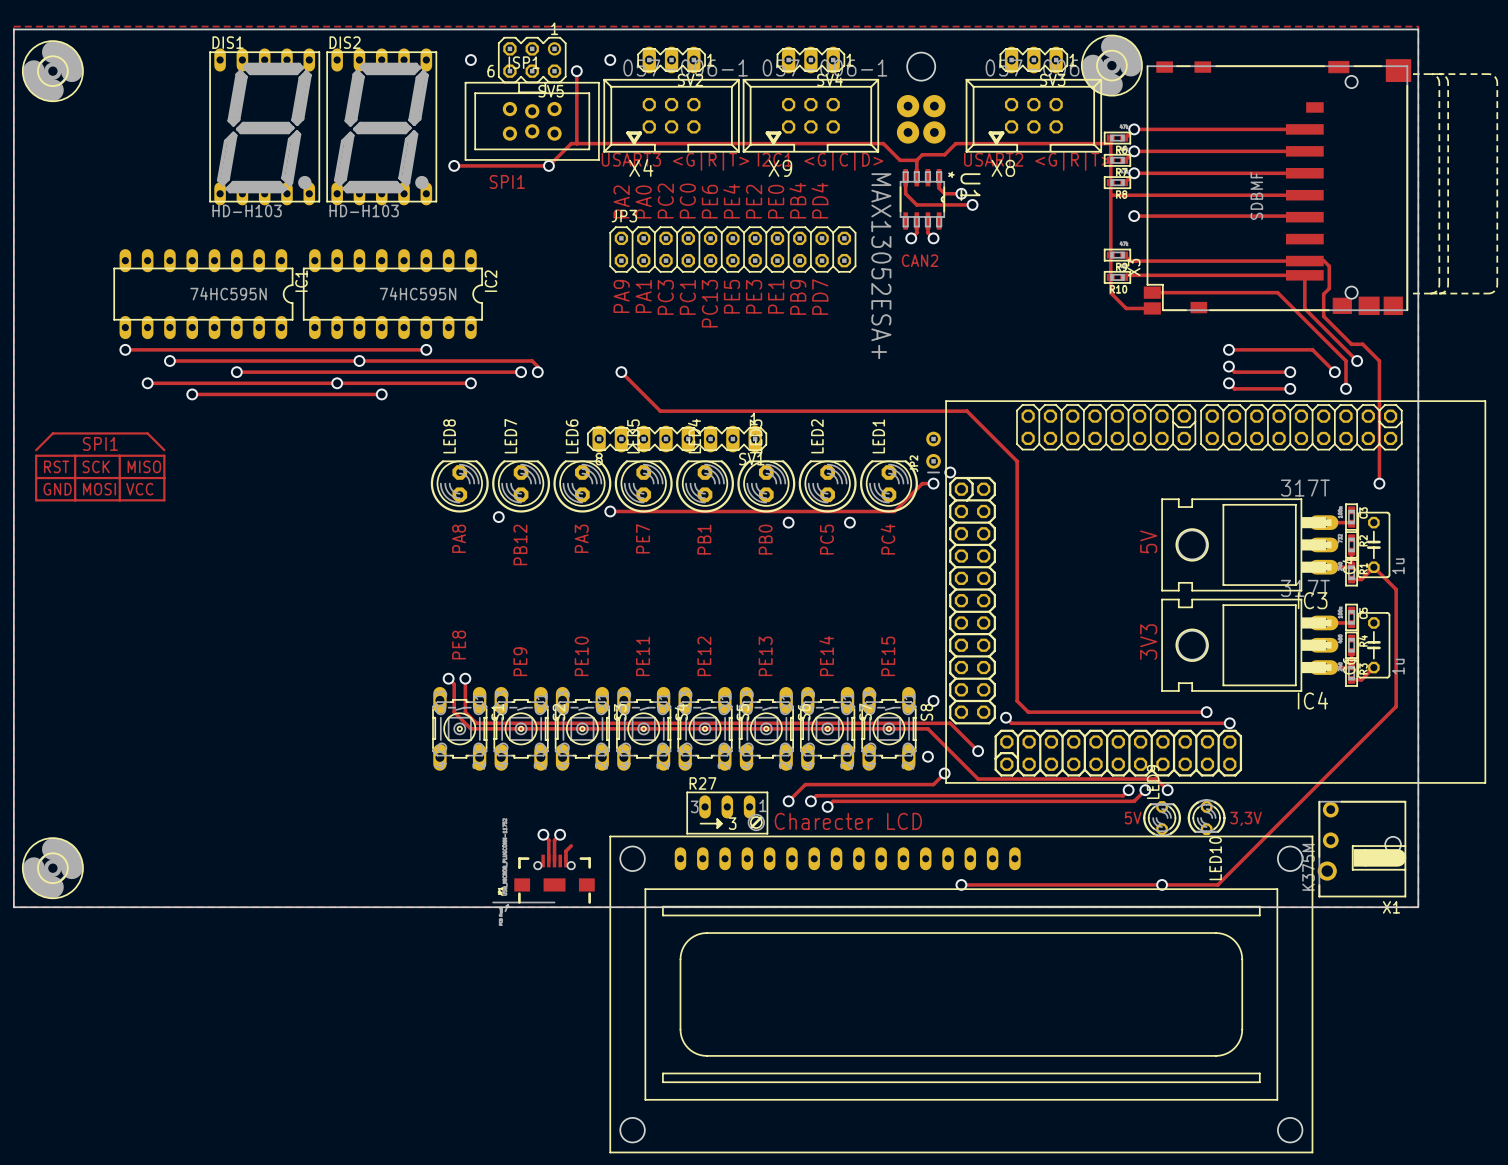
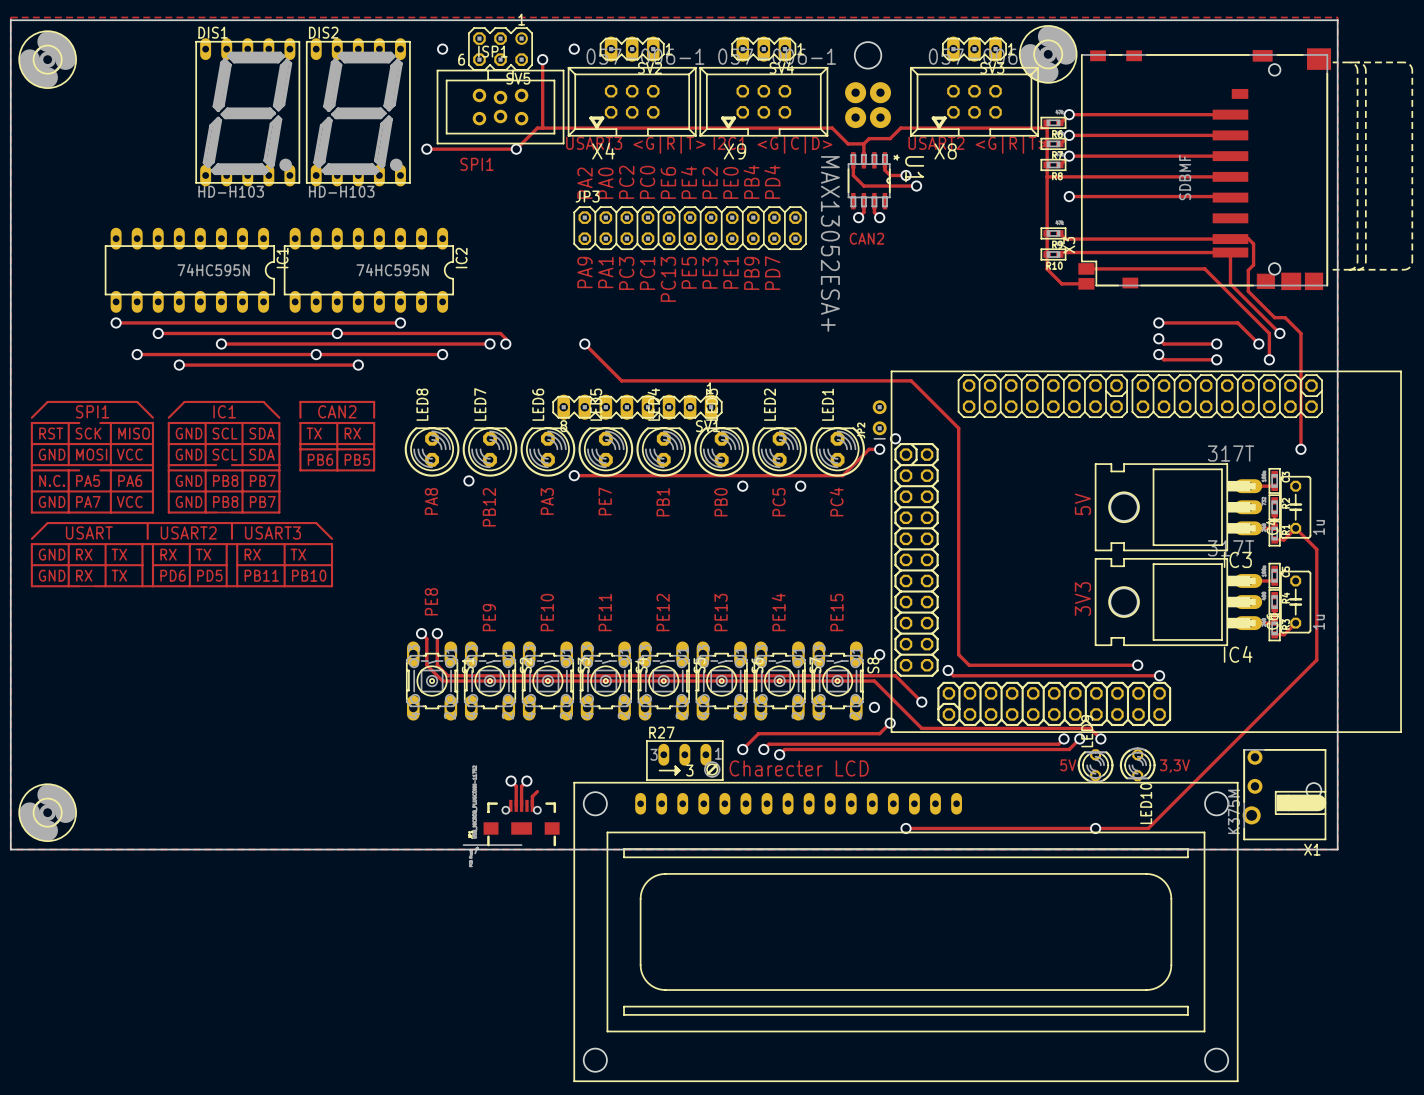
text: none -> IC1 (224, 411)
text: none -> CAN2 (337, 411)
track: none -> (168, 417) (184, 401) (263, 401) (279, 417)
track: none -> (300, 417) (300, 401) (374, 401) (374, 417)
track: (86, 455) (108, 455) -> none
track: none -> (168, 423) (279, 423) (279, 512) (168, 512) (168, 423)
track: none -> (205, 423) (205, 465)
track: none -> (242, 423) (242, 465)
track: none -> (300, 423) (374, 423) (374, 470) (300, 470) (300, 423)
track: none -> (337, 423) (337, 470)
text: none -> GND (189, 433)
text: none -> SCL (225, 433)
text: none -> SDA (262, 433)
text: none -> TX (314, 433)
text: none -> RX (352, 433)
track: none -> (168, 444) (279, 444)
track: none -> (300, 444) (374, 444)
track: none -> (300, 449) (374, 449)
text: none -> GND (189, 454)
text: none -> SCL (225, 454)
text: none -> SDA (262, 454)
text: none -> PB6 (320, 459)
text: none -> PB5 (357, 459)
track: none -> (31, 465) (31, 512) (152, 512) (152, 465)
track: none -> (168, 465) (216, 465)
track: none -> (231, 465) (279, 465)
track: none -> (31, 470) (79, 470)
track: none -> (68, 470) (68, 512)
track: none -> (100, 470) (152, 470)
track: none -> (110, 470) (110, 512)
track: none -> (168, 470) (279, 470)
track: none -> (205, 470) (205, 512)
track: none -> (242, 470) (242, 512)
text: none -> N.C. (52, 480)
text: none -> PA5 (88, 480)
text: none -> PA6 (130, 480)
text: none -> GND (189, 480)
text: none -> PB8 (225, 480)
text: none -> PB7 (262, 480)
track: none -> (31, 491) (152, 491)
track: none -> (168, 491) (279, 491)
text: none -> GND (52, 501)
text: none -> PA7 (88, 501)
text: none -> VCC (129, 501)
text: none -> GND (189, 501)
text: none -> PB8 (225, 501)
text: none -> PB7 (262, 501)
track: none -> (147, 523) (147, 538)
track: none -> (231, 523) (231, 538)
text: none -> USART (89, 532)
text: none -> USART2 (188, 532)
text: none -> USART3 (272, 532)
track: none -> (31, 538) (47, 523) (316, 523) (332, 538)
track: none -> (31, 544) (31, 586) (332, 586) (332, 544) (31, 544)
track: none -> (68, 544) (68, 586)
track: none -> (105, 544) (105, 586)
track: none -> (142, 544) (142, 586)
track: none -> (152, 544) (152, 586)
track: none -> (189, 544) (189, 586)
track: none -> (226, 544) (226, 586)
track: none -> (237, 544) (237, 586)
track: none -> (284, 544) (284, 586)
text: none -> GND (52, 554)
text: none -> RX (84, 554)
text: none -> TX (119, 554)
text: none -> RX (168, 554)
text: none -> TX (203, 554)
text: none -> RX (252, 554)
text: none -> TX (298, 554)
track: none -> (31, 565) (142, 565)
track: none -> (152, 565) (226, 565)
track: none -> (237, 565) (332, 565)
text: none -> GND (52, 575)
text: none -> RX (84, 575)
text: none -> TX (119, 575)
text: none -> PD6 (173, 575)
text: none -> PD5 (209, 575)
text: none -> PB11 (261, 575)
text: none -> PB10 (309, 575)

